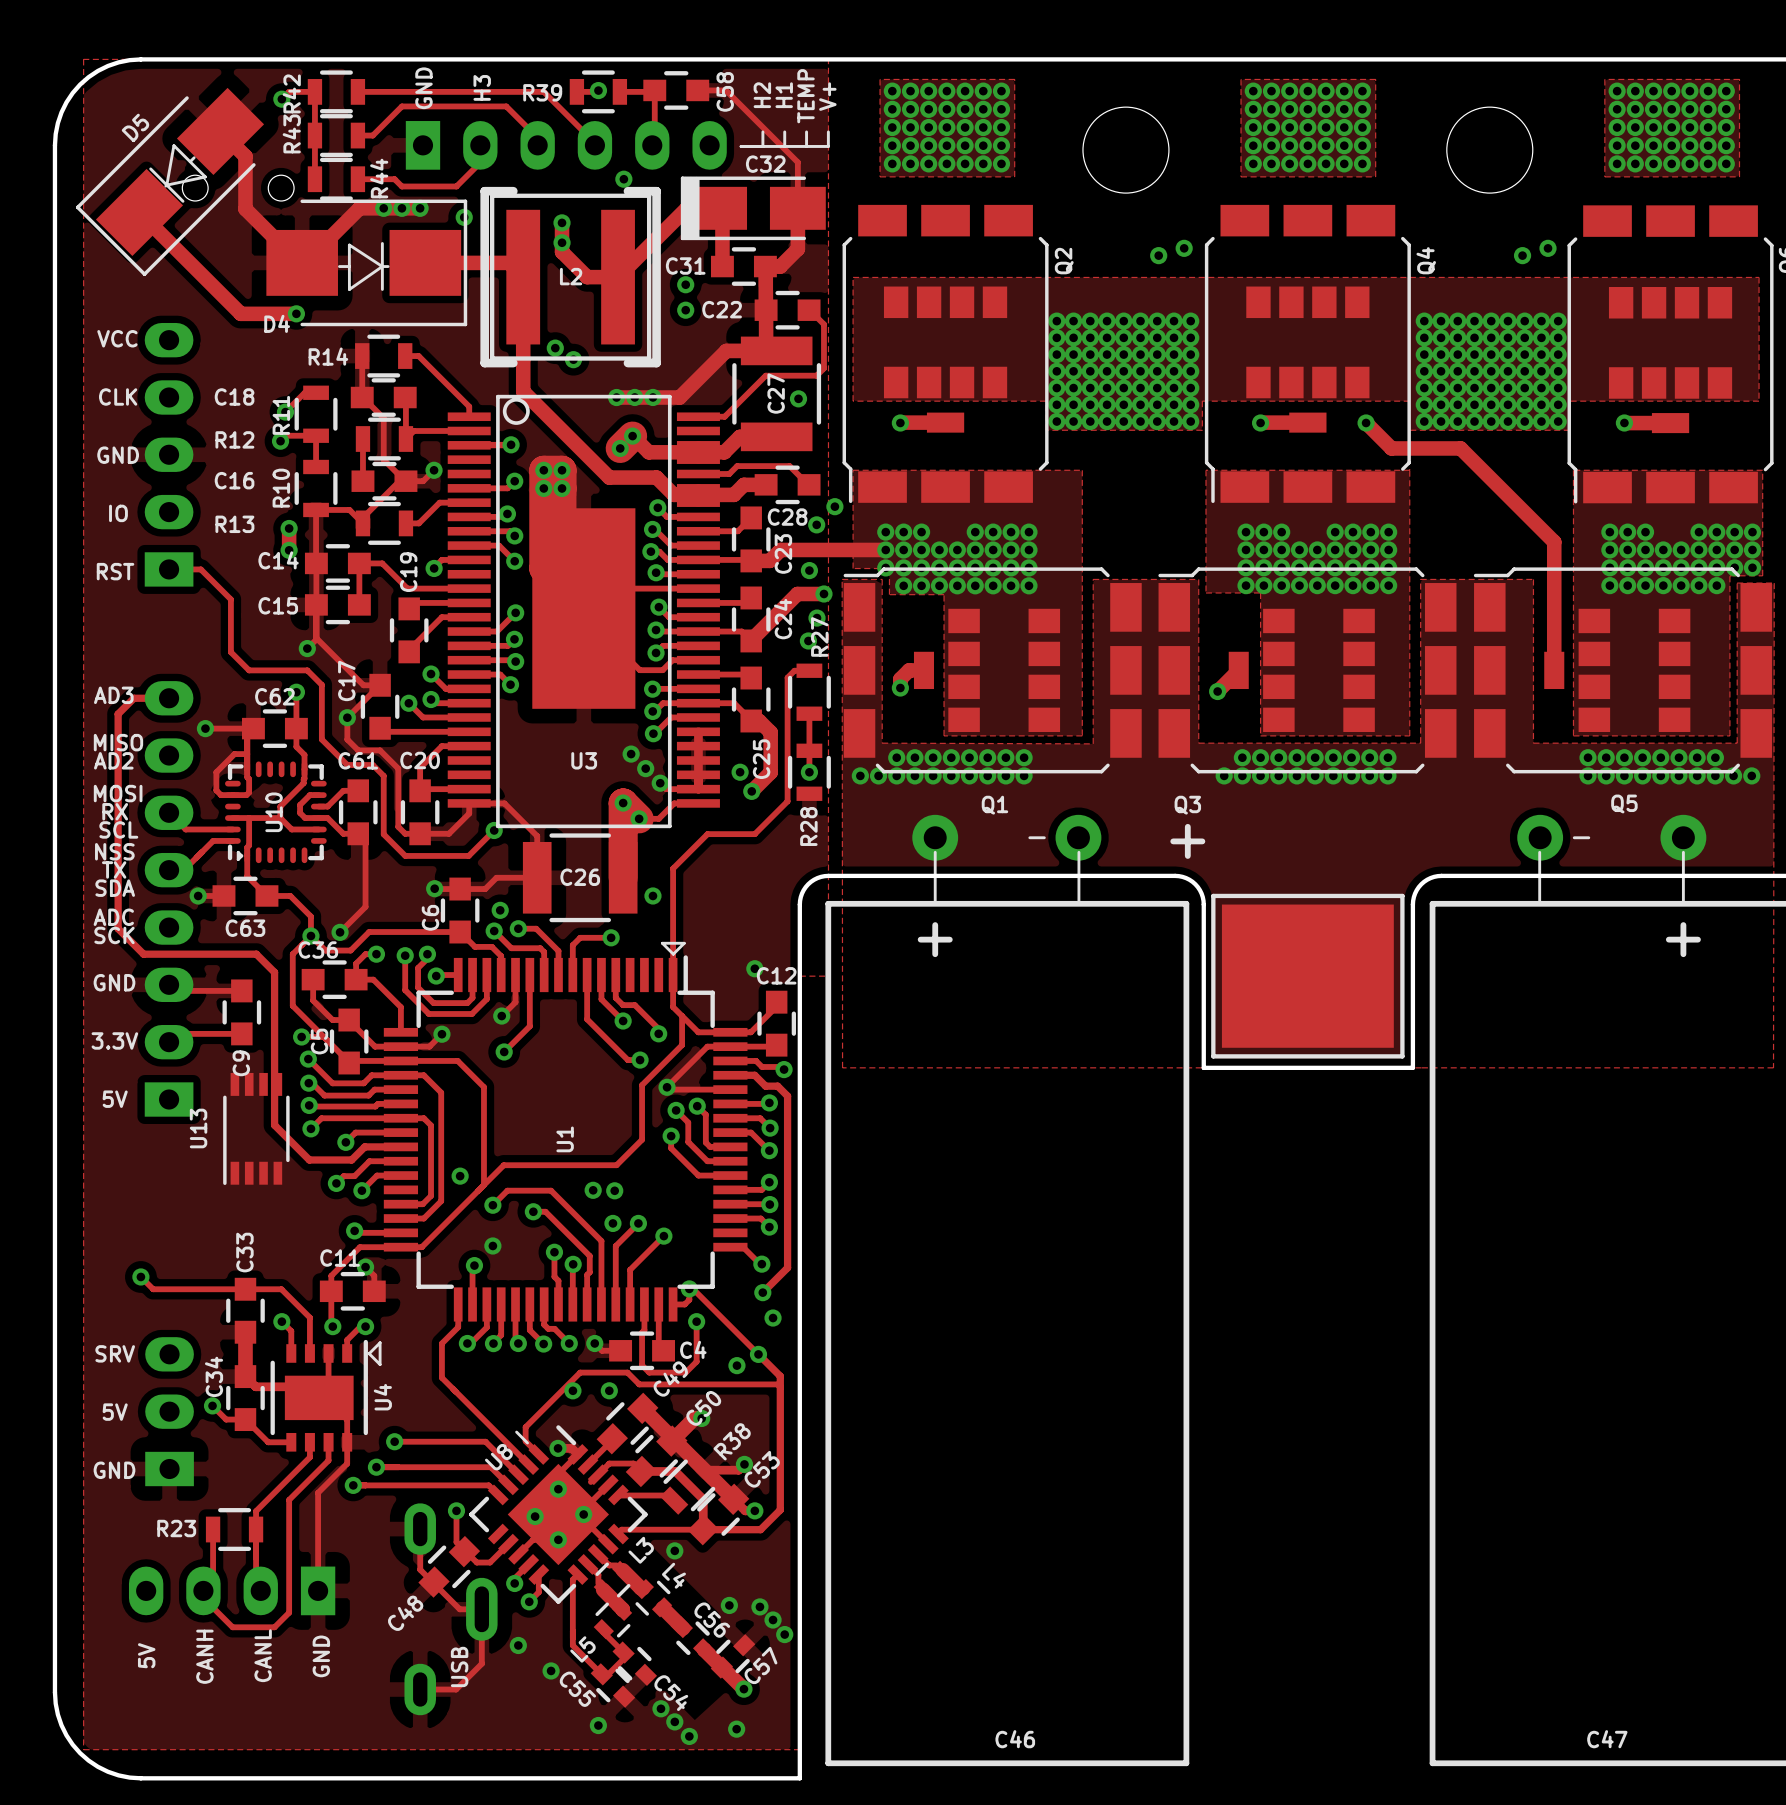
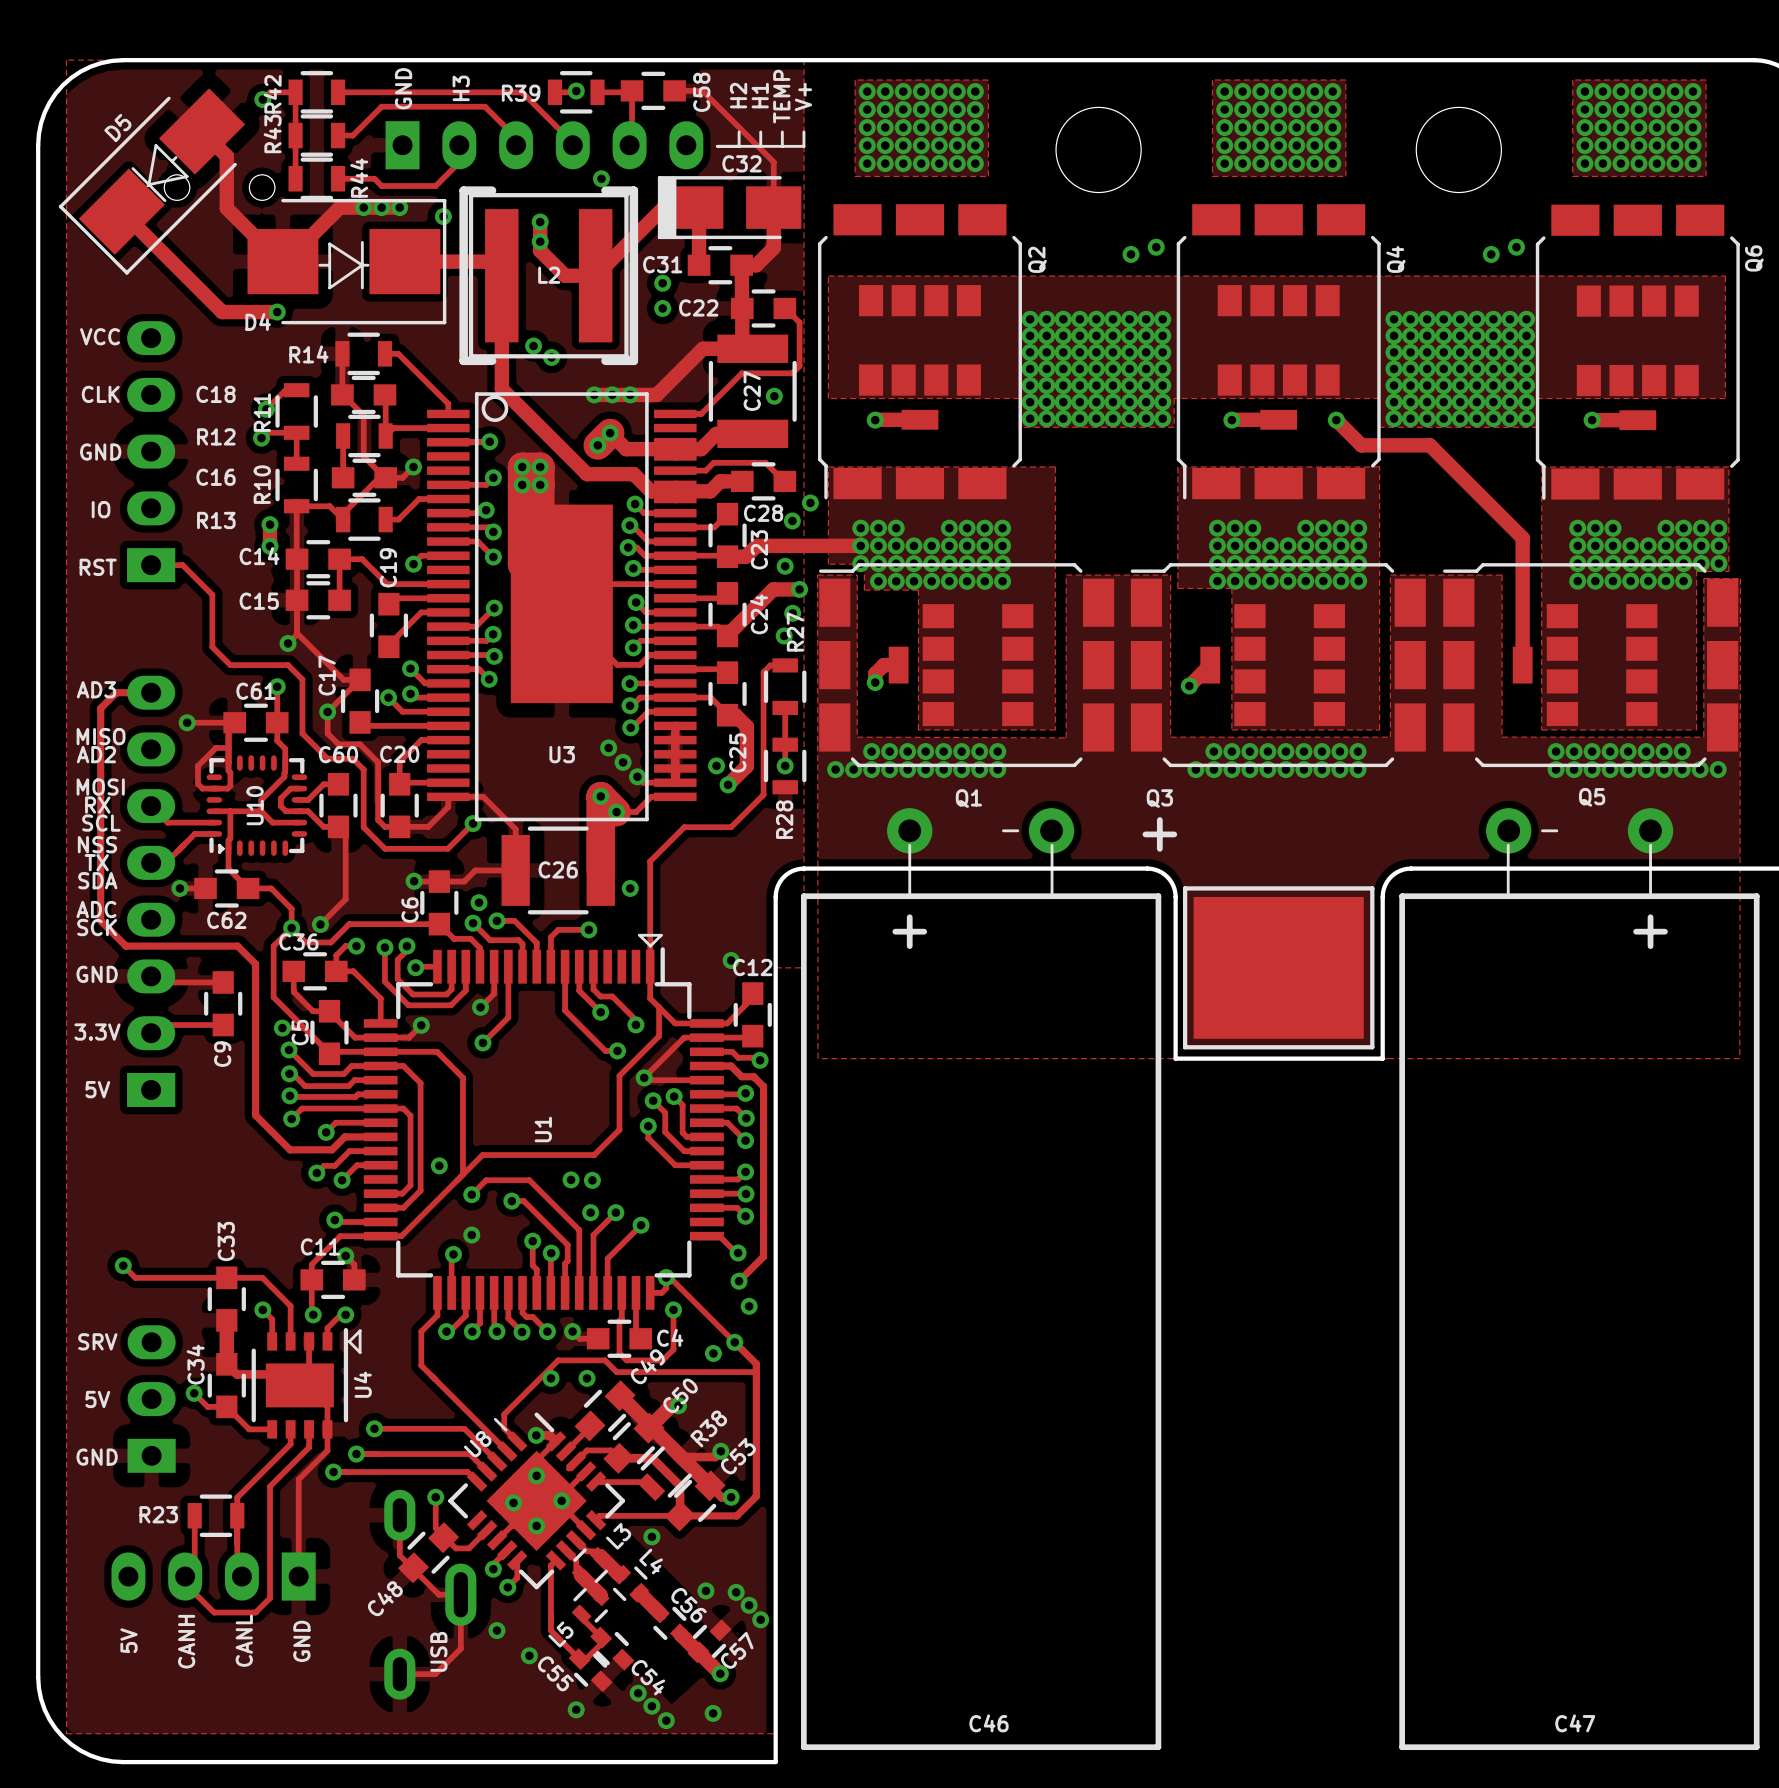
C62 name: C62 (274, 696) -> C61 (255, 691)
C61 name: C61 (358, 760) -> C60 (338, 754)
C63 name: C63 (245, 928) -> C62 (226, 920)
U13: (256, 1128) -> none

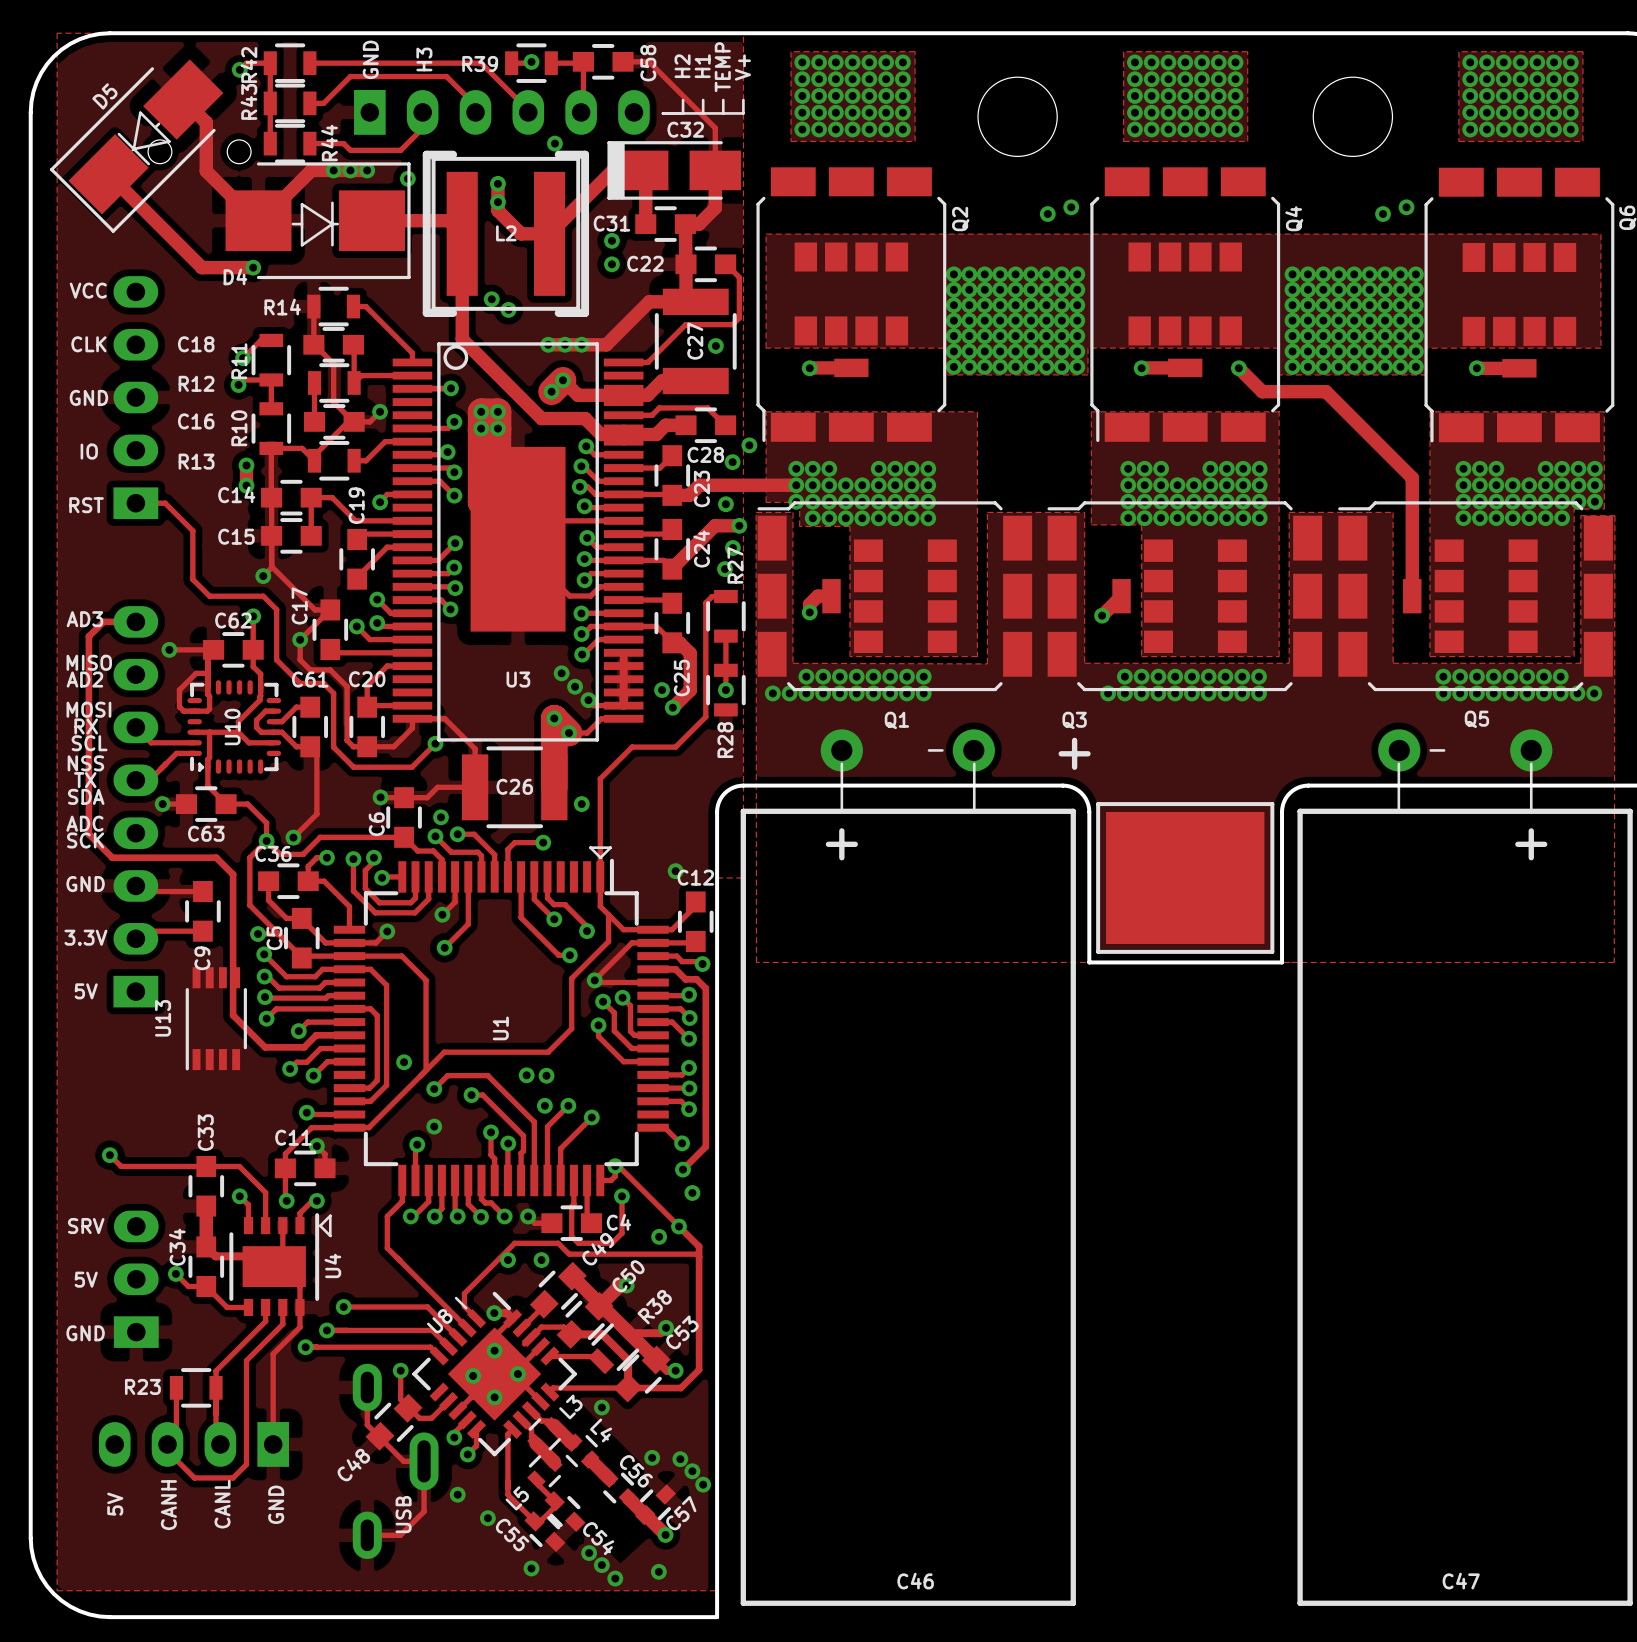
C61 name: C61 (255, 691) -> C62 (233, 620)
C60 name: C60 (338, 754) -> C61 (310, 679)
C62 name: C62 (226, 920) -> C63 (206, 833)
U13: none -> (216, 1018)

